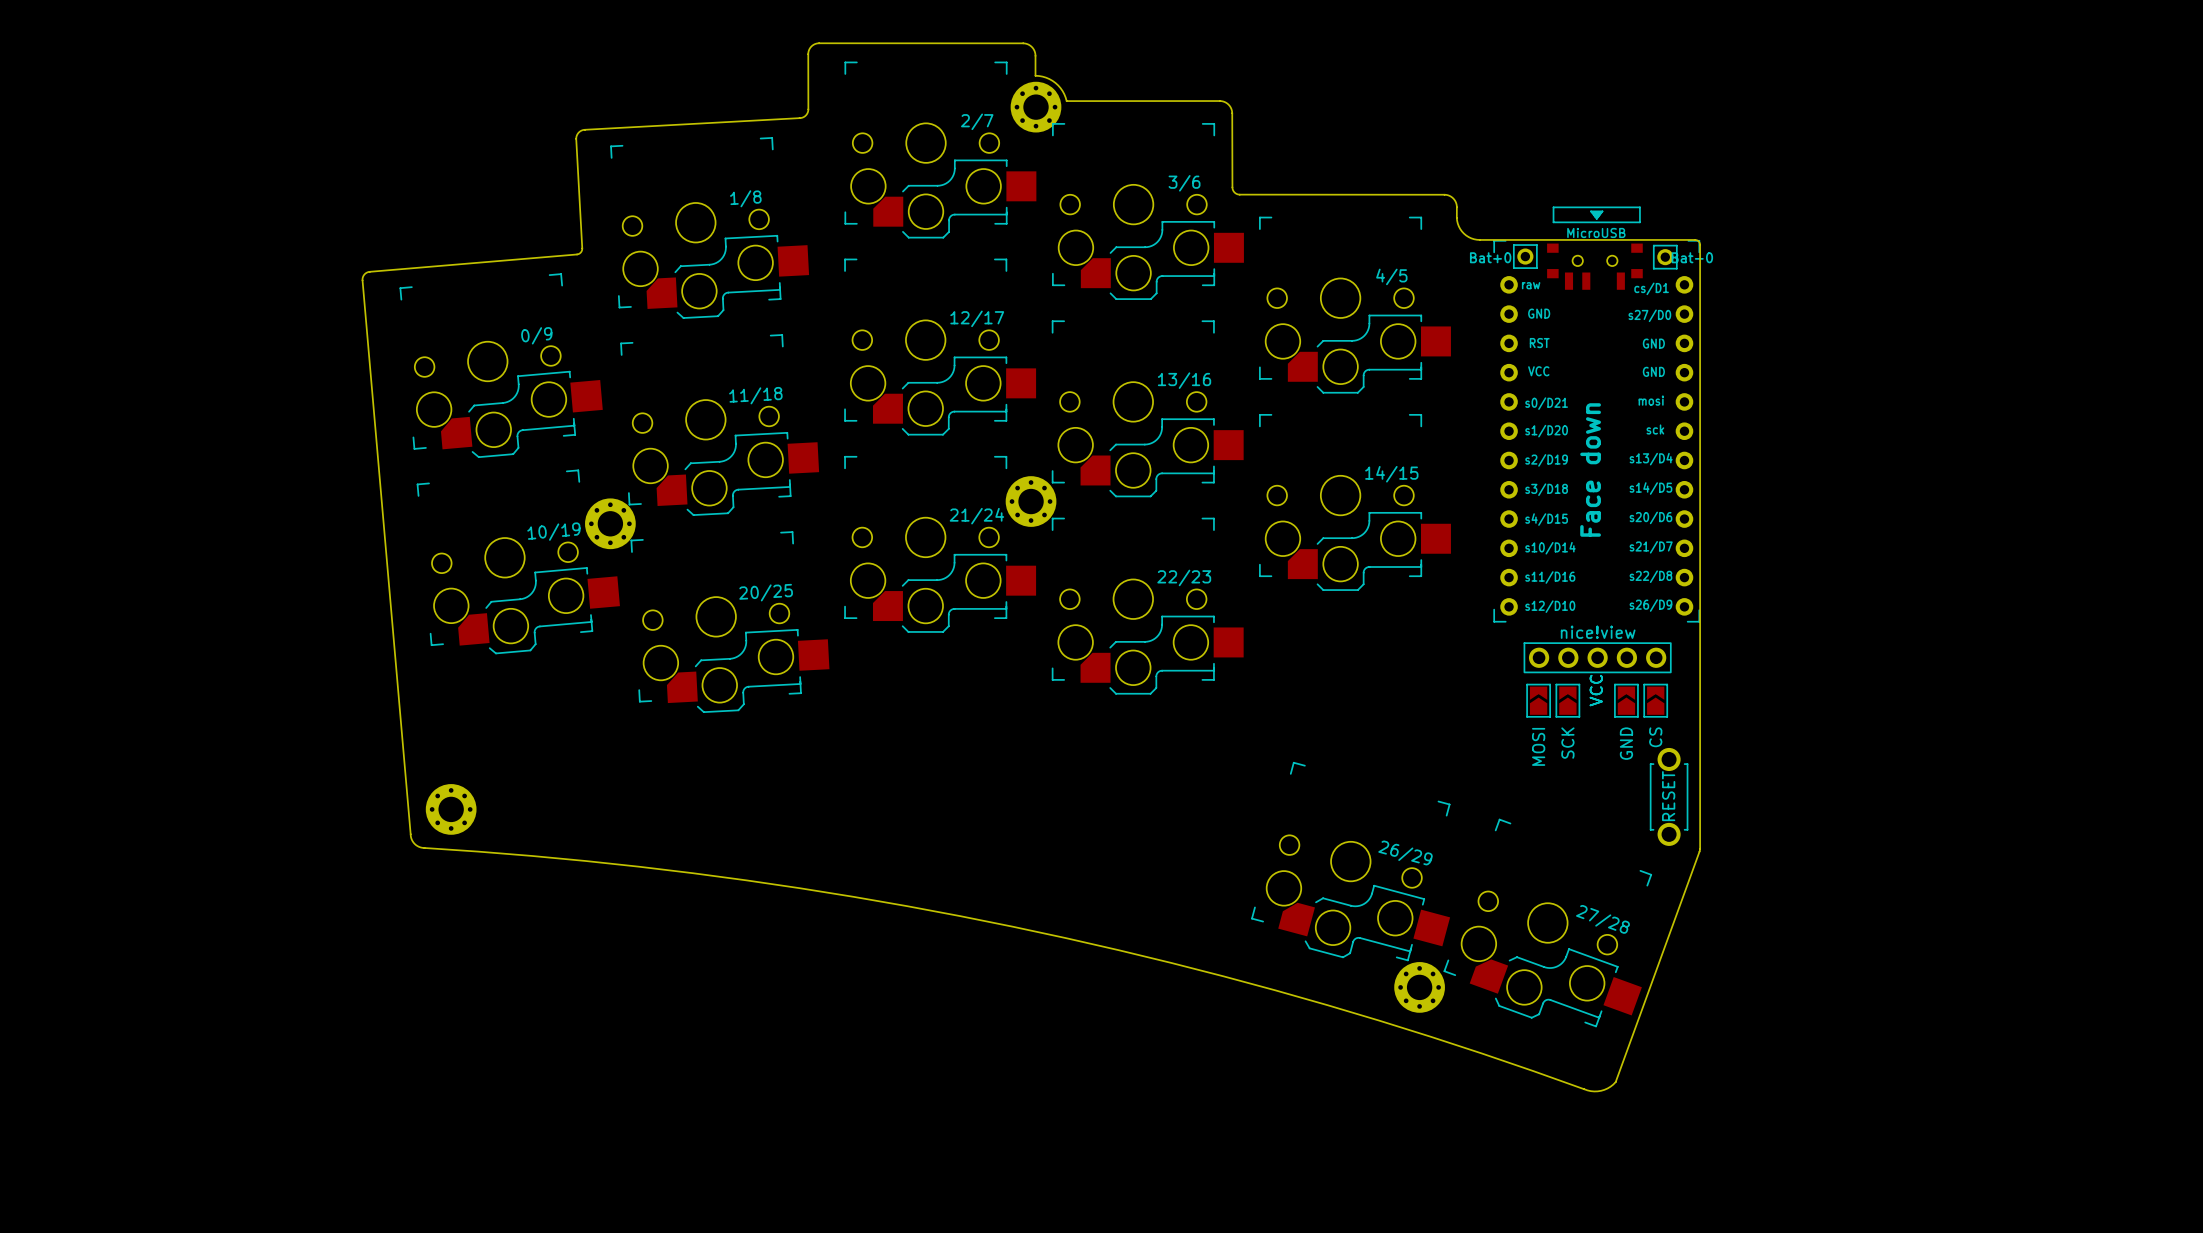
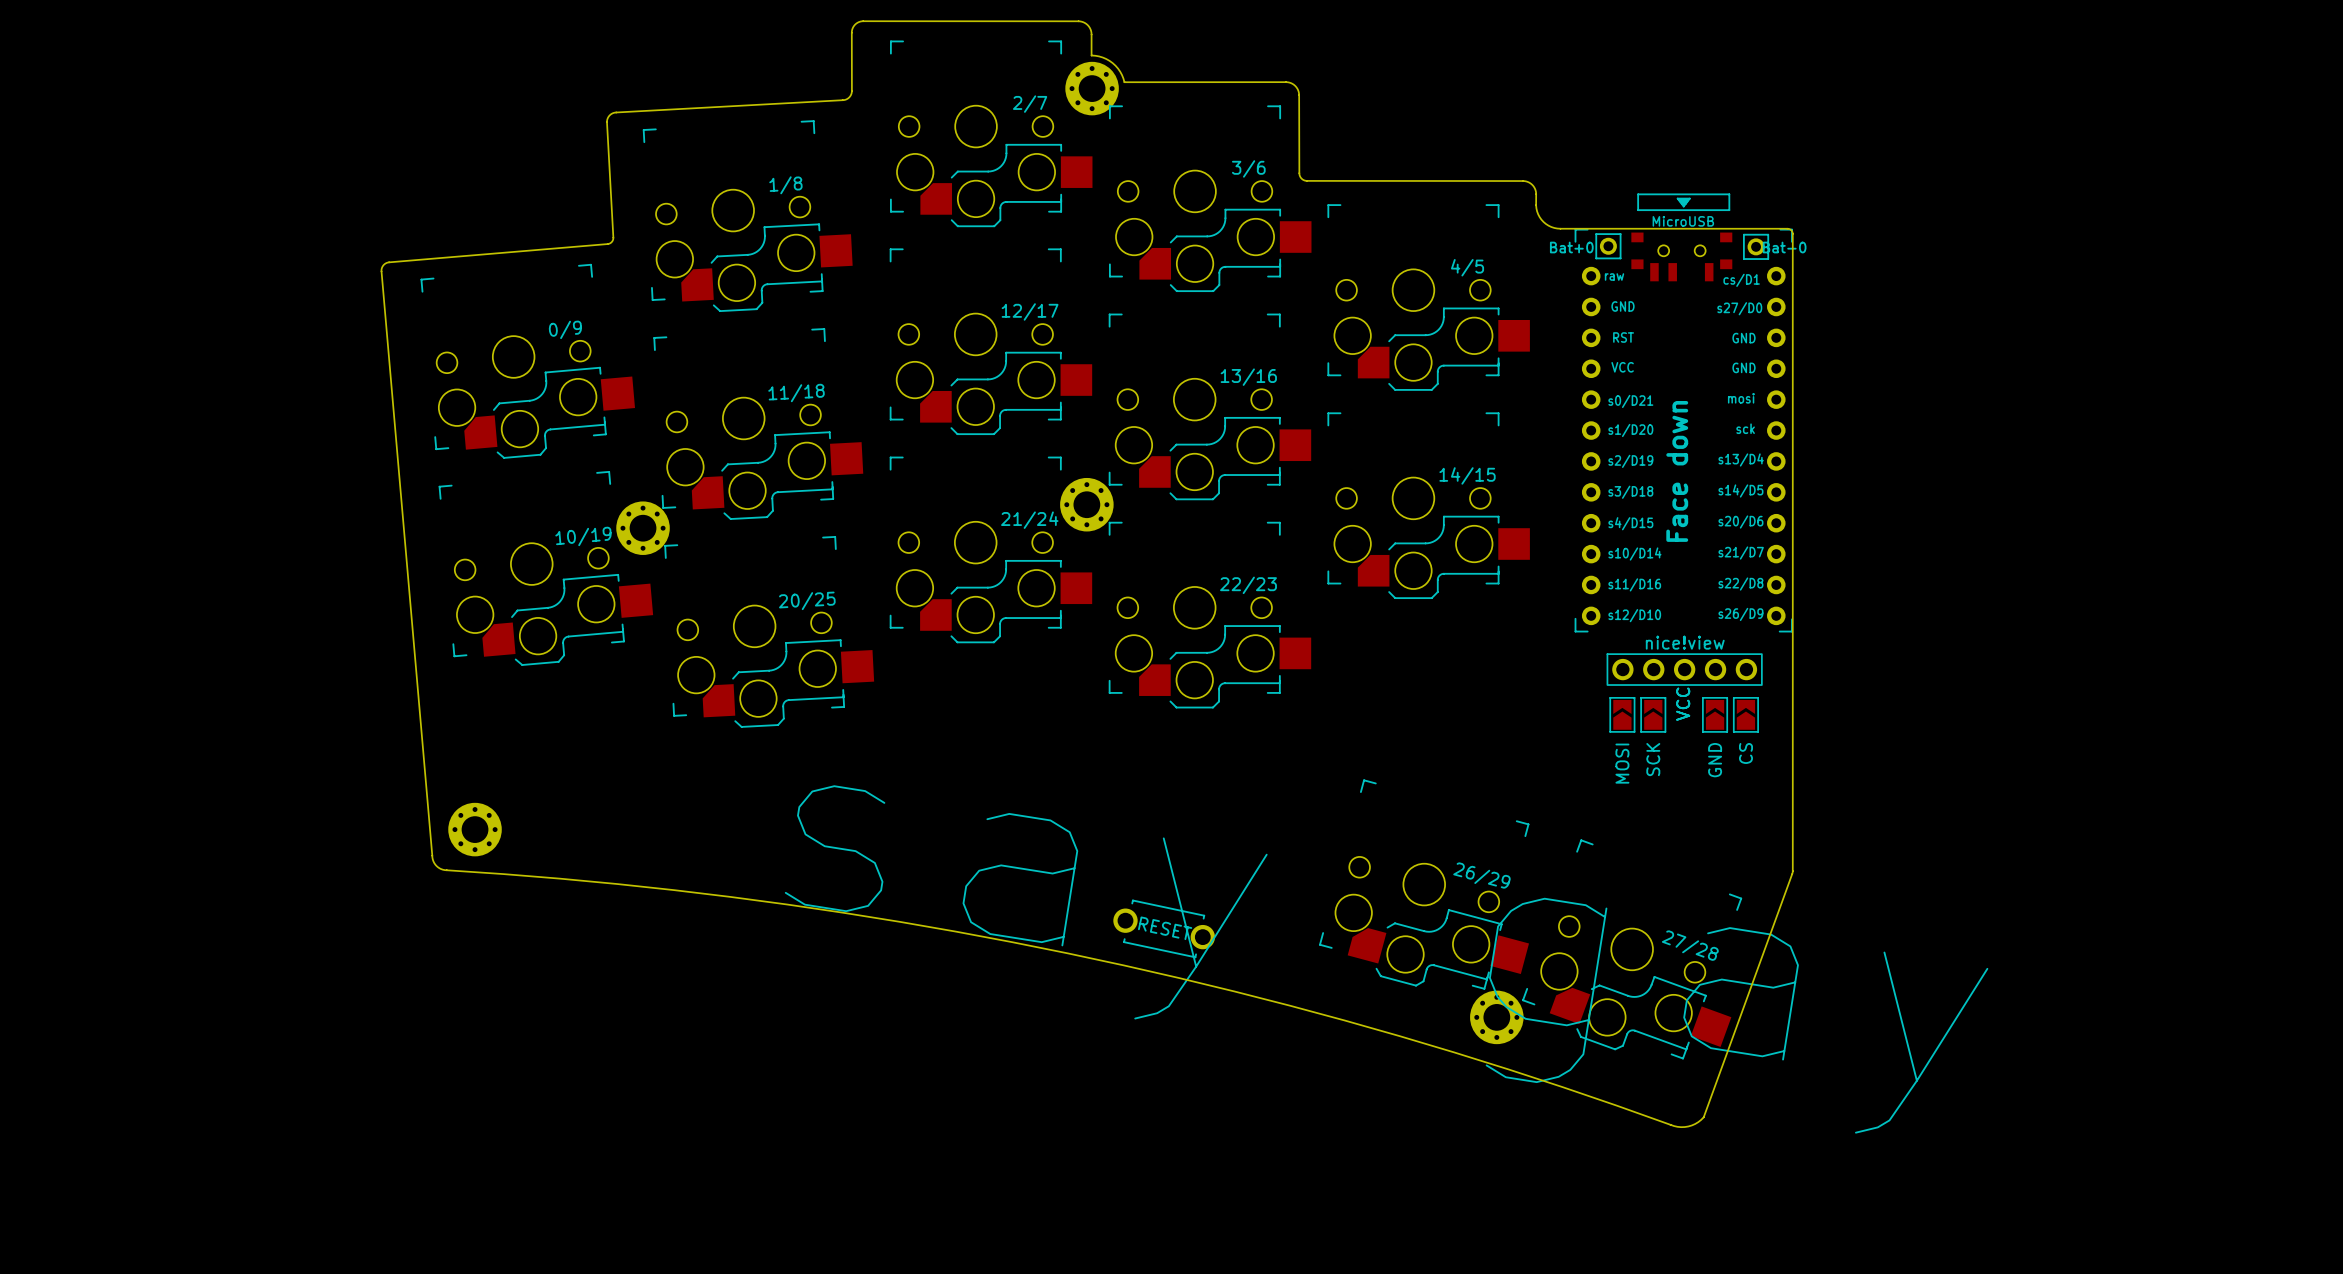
part: (1669, 796) -> none
part: none -> (1164, 928)
text: none -> say gay (1386, 959)

